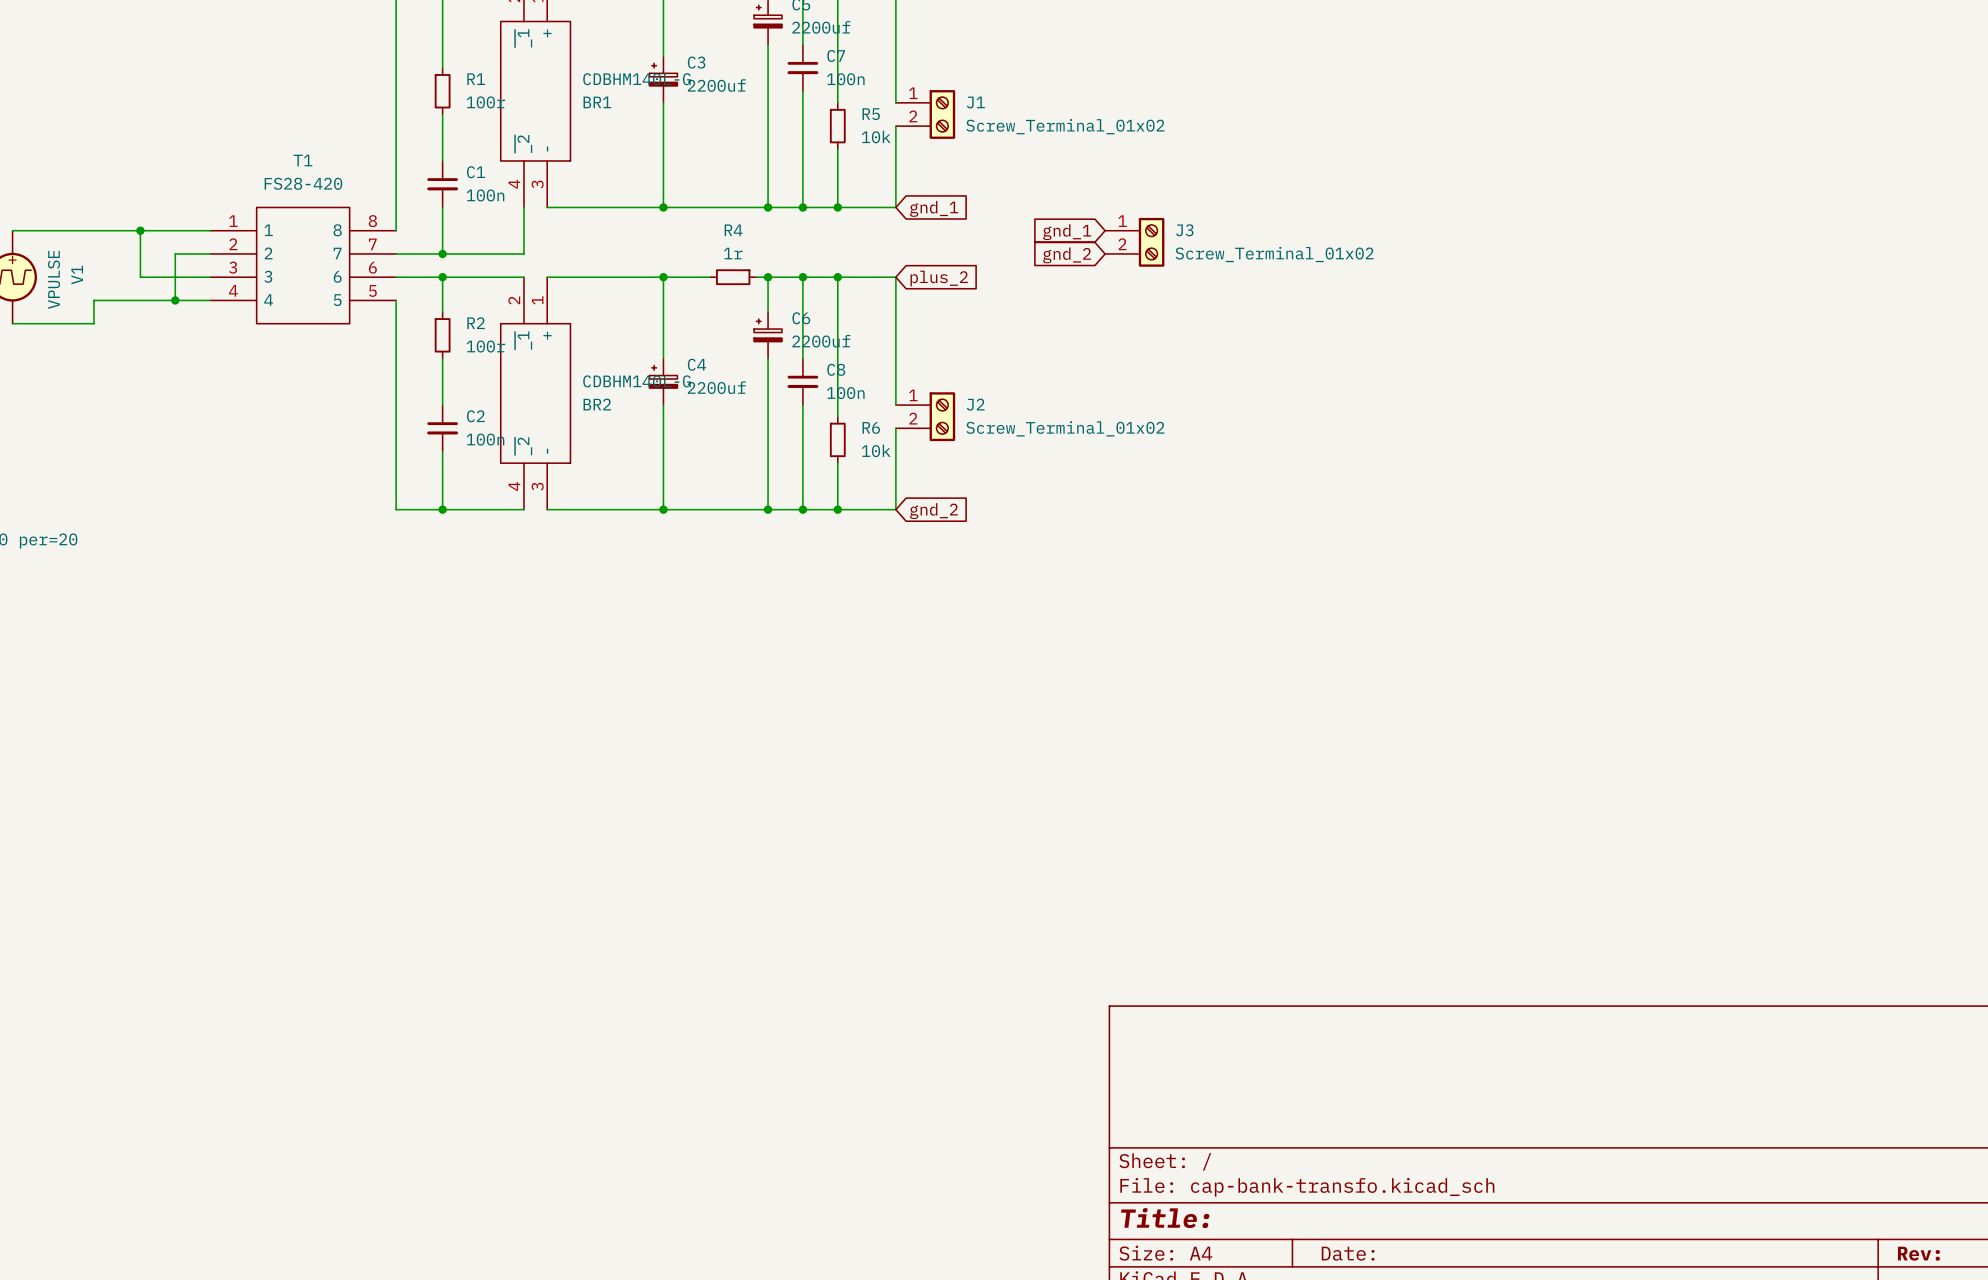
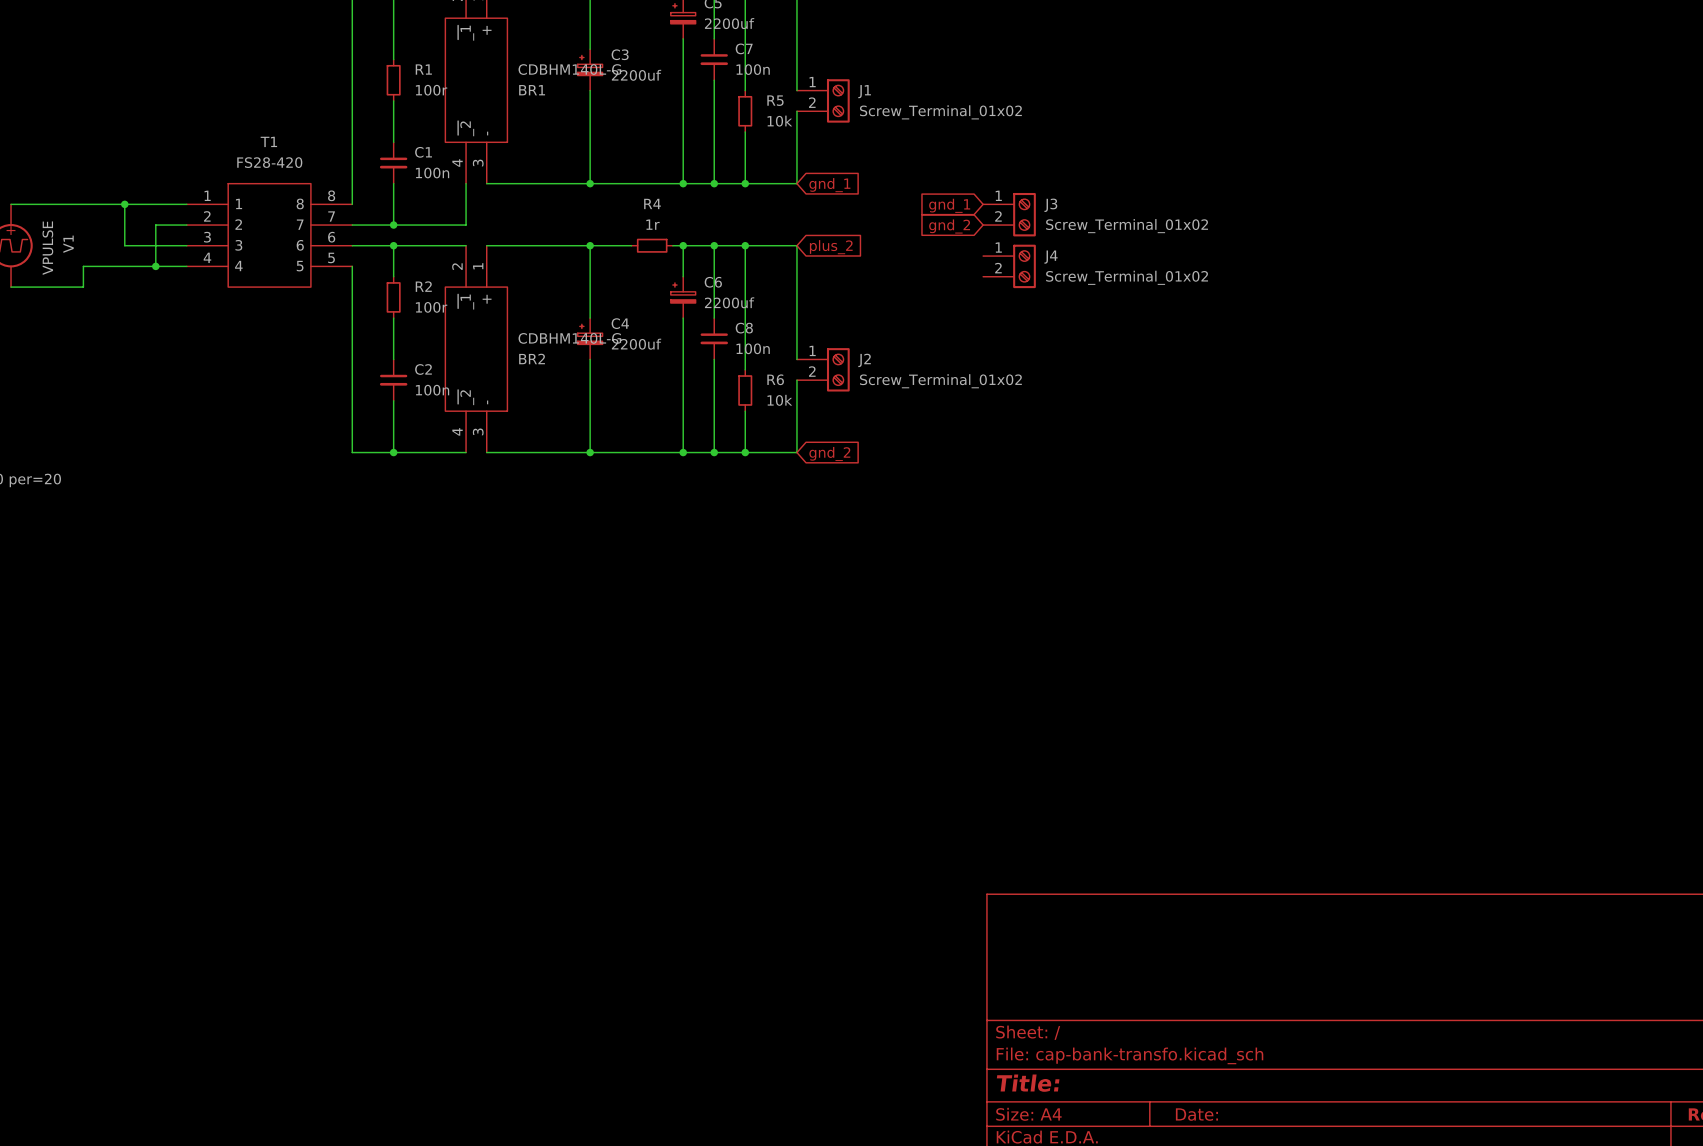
J4: none -> Screw_Terminal_01x02 (1009, 266)

